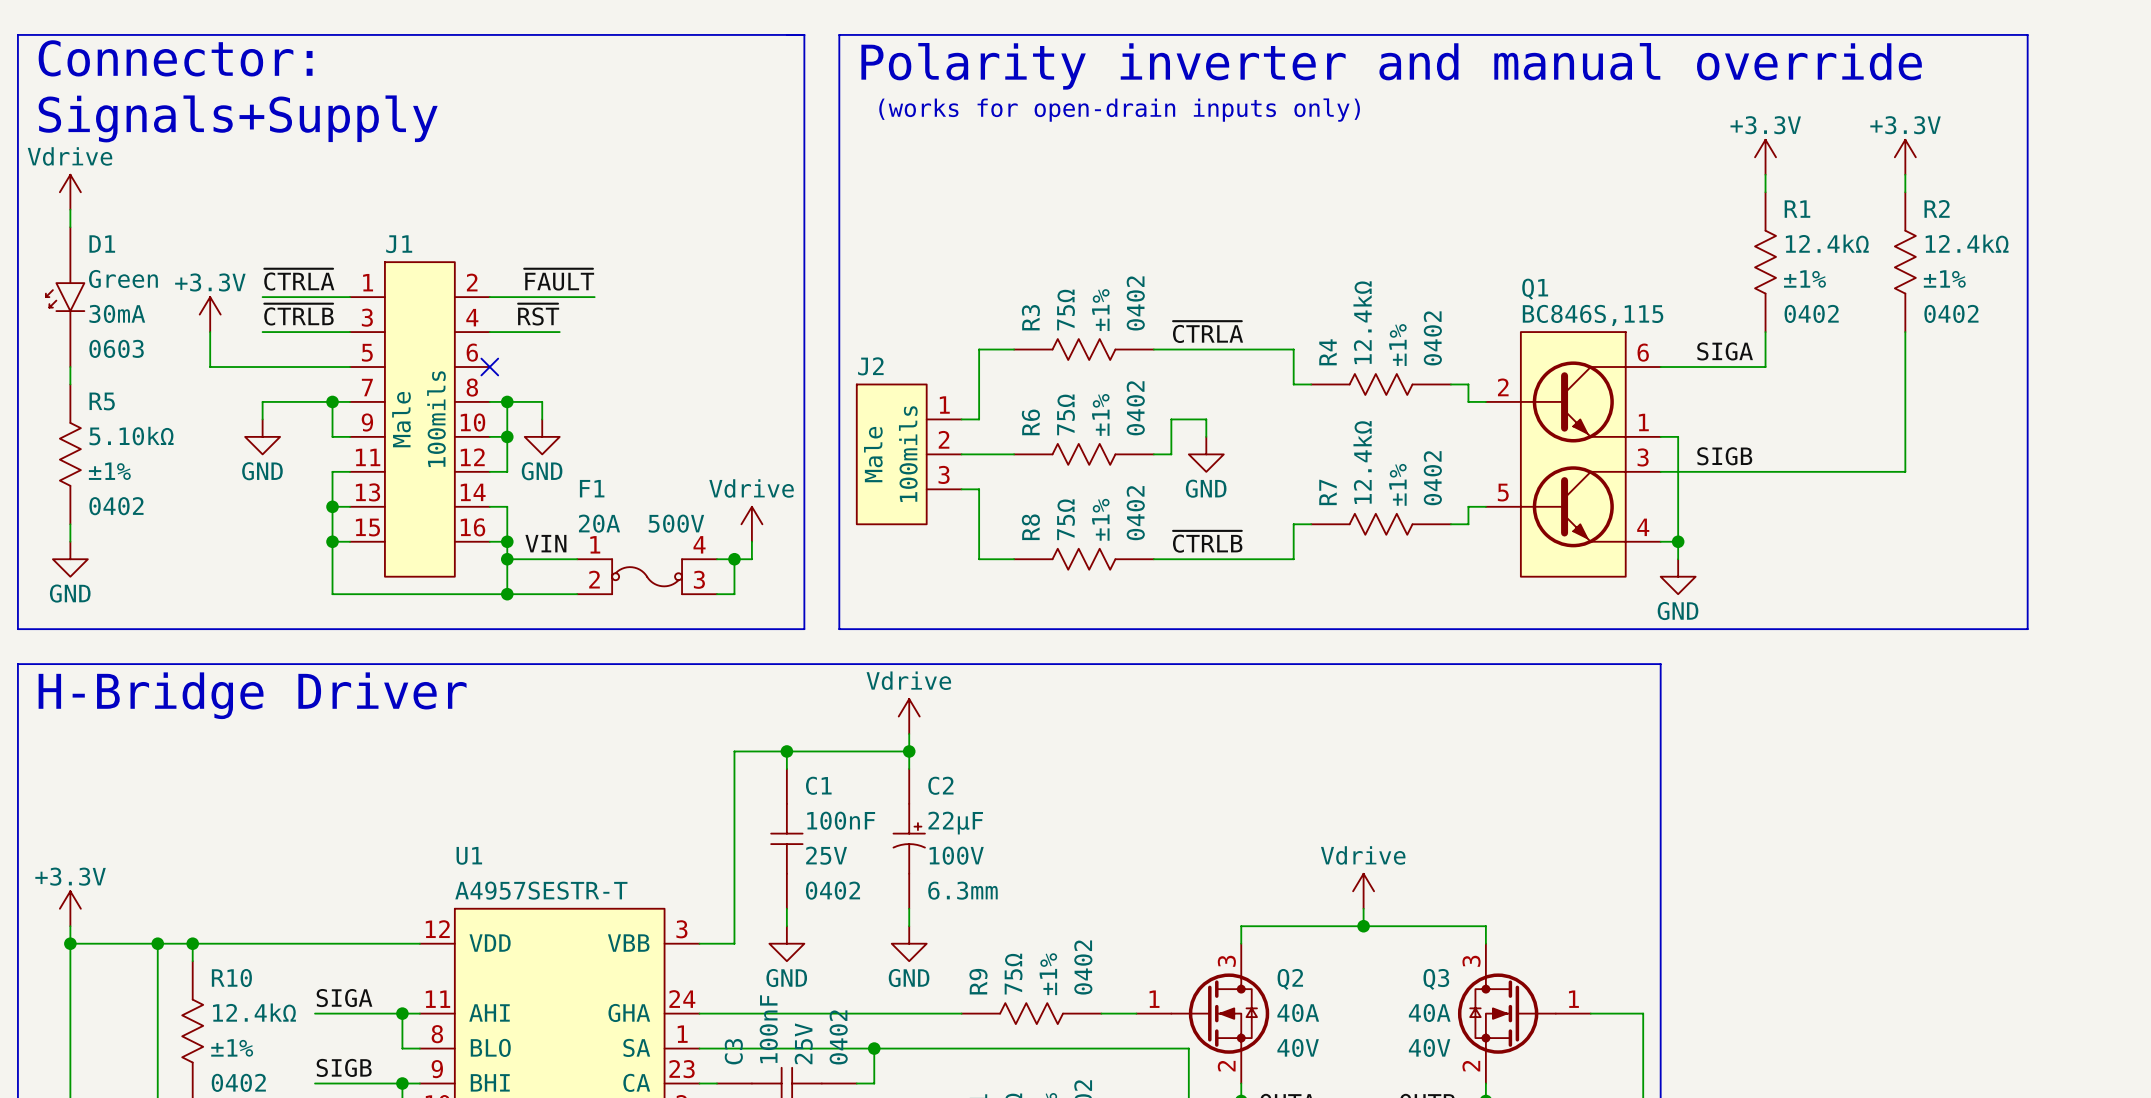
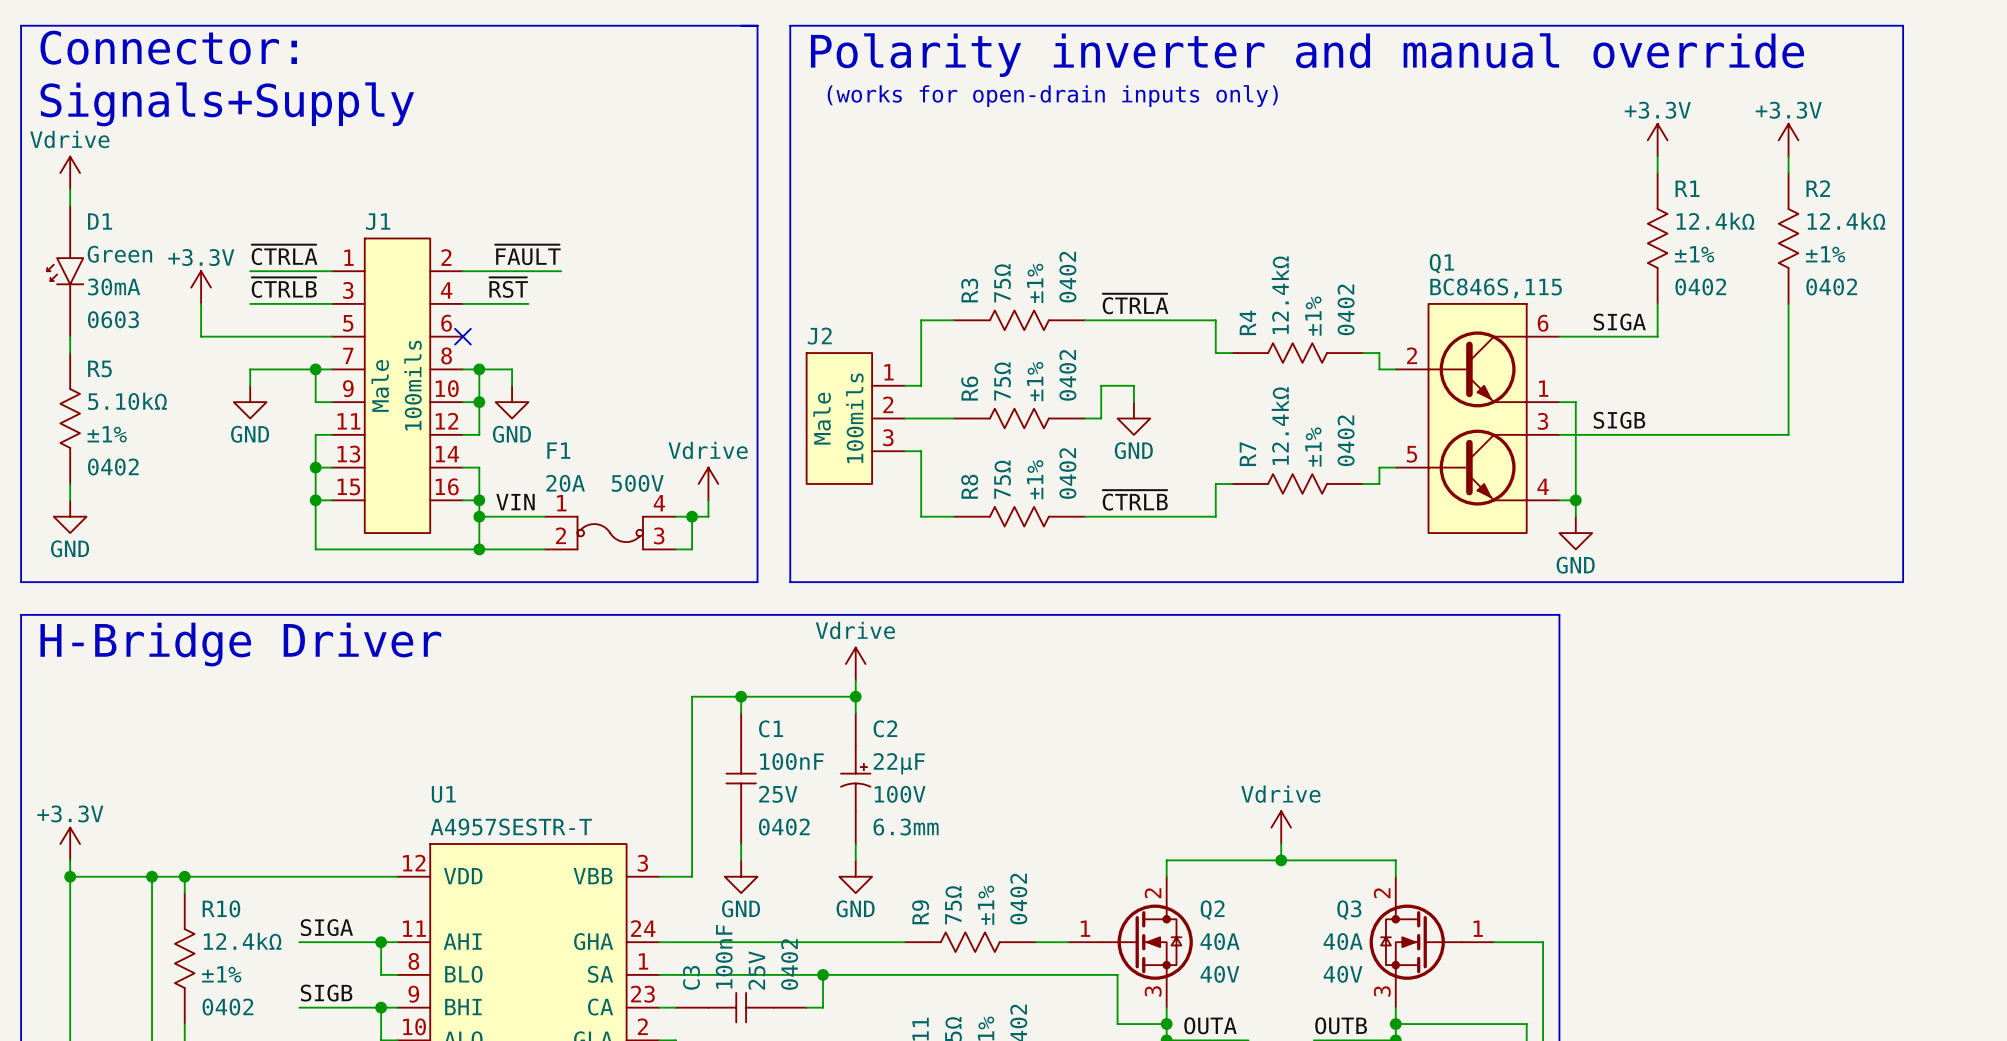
Q2 pin number: 3 (1226, 961) -> 2 (1153, 893)
Q3 pin number: 3 (1471, 961) -> 2 (1382, 893)
Q2 pin number: 2 (1226, 1066) -> 3 (1153, 991)
Q3 pin number: 2 (1471, 1066) -> 3 (1382, 991)

